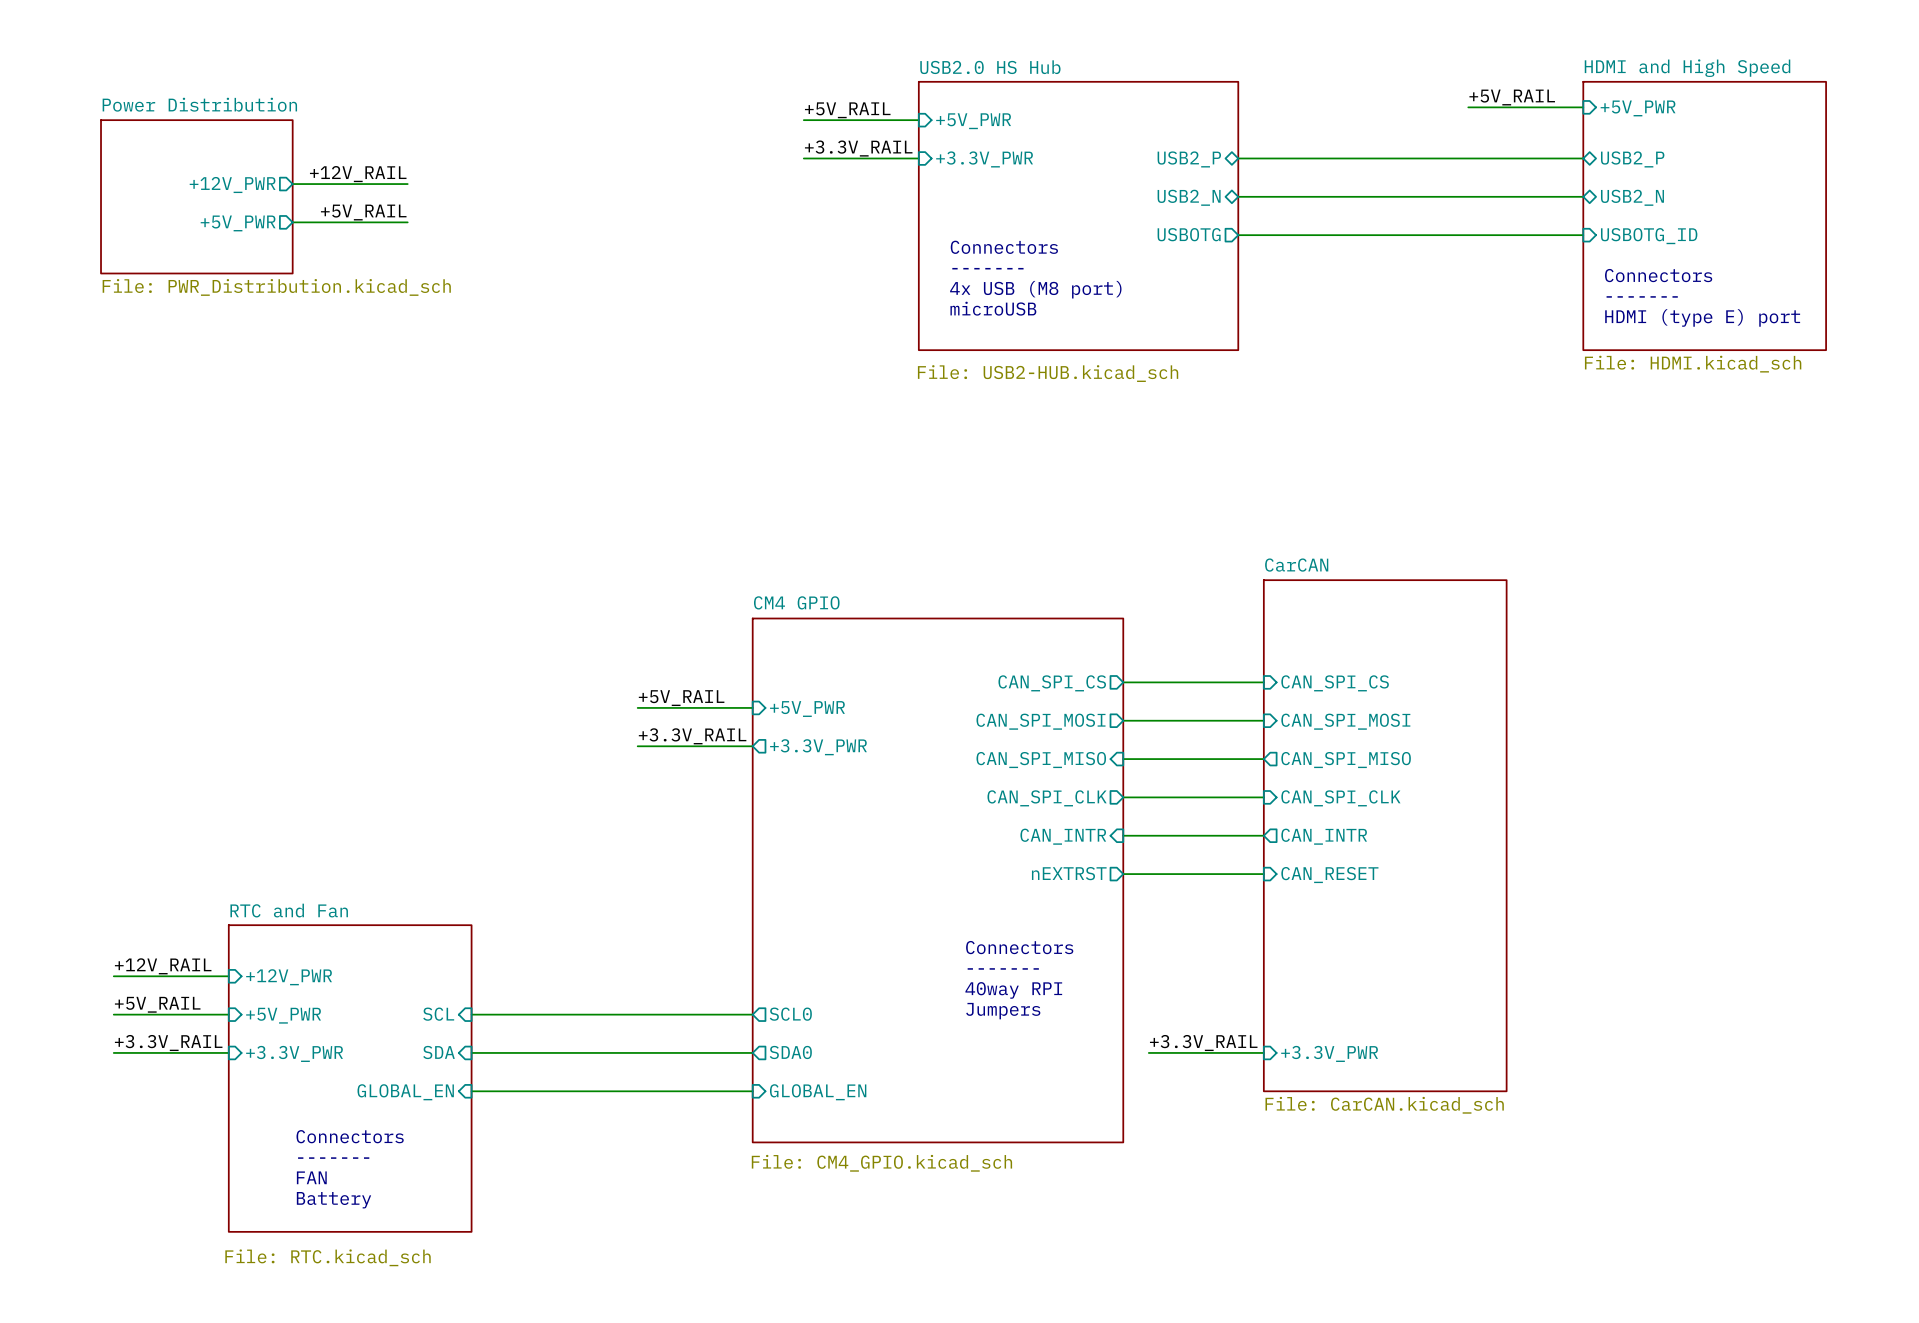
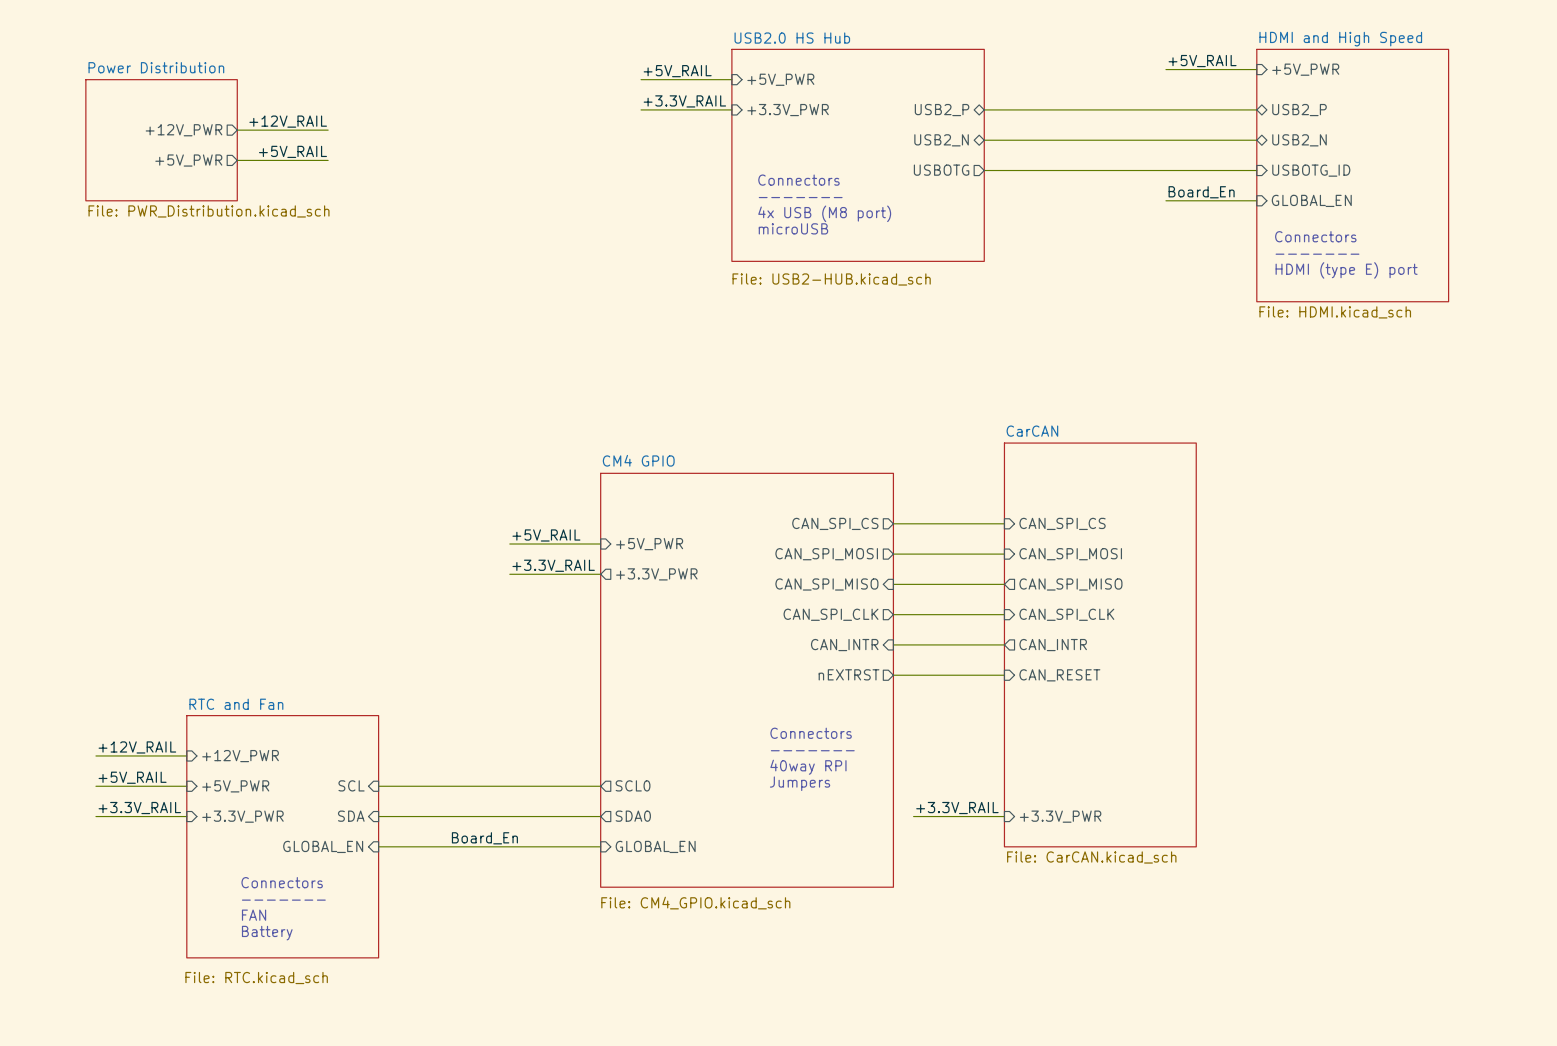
sheet HDMI and High Speed: File: HDMI.kicad_sch (1704, 215) -> none
sheet HDMI and High Speed: none -> File: HDMI.kicad_sch (1352, 175)
label: none -> Board_En (1201, 192)
wire: none -> (1165, 200) (1256, 200)
sheet pin: none -> GLOBAL_EN (1311, 200)
text: Connectors (1658, 275) -> none
text position: ------- (1642, 296) -> ------- (1317, 254)
text: HDMI (type E) port (1702, 317) -> Connectors (1315, 236)
text: none -> HDMI (type E) port (1346, 270)
label: none -> Board_En (484, 838)

